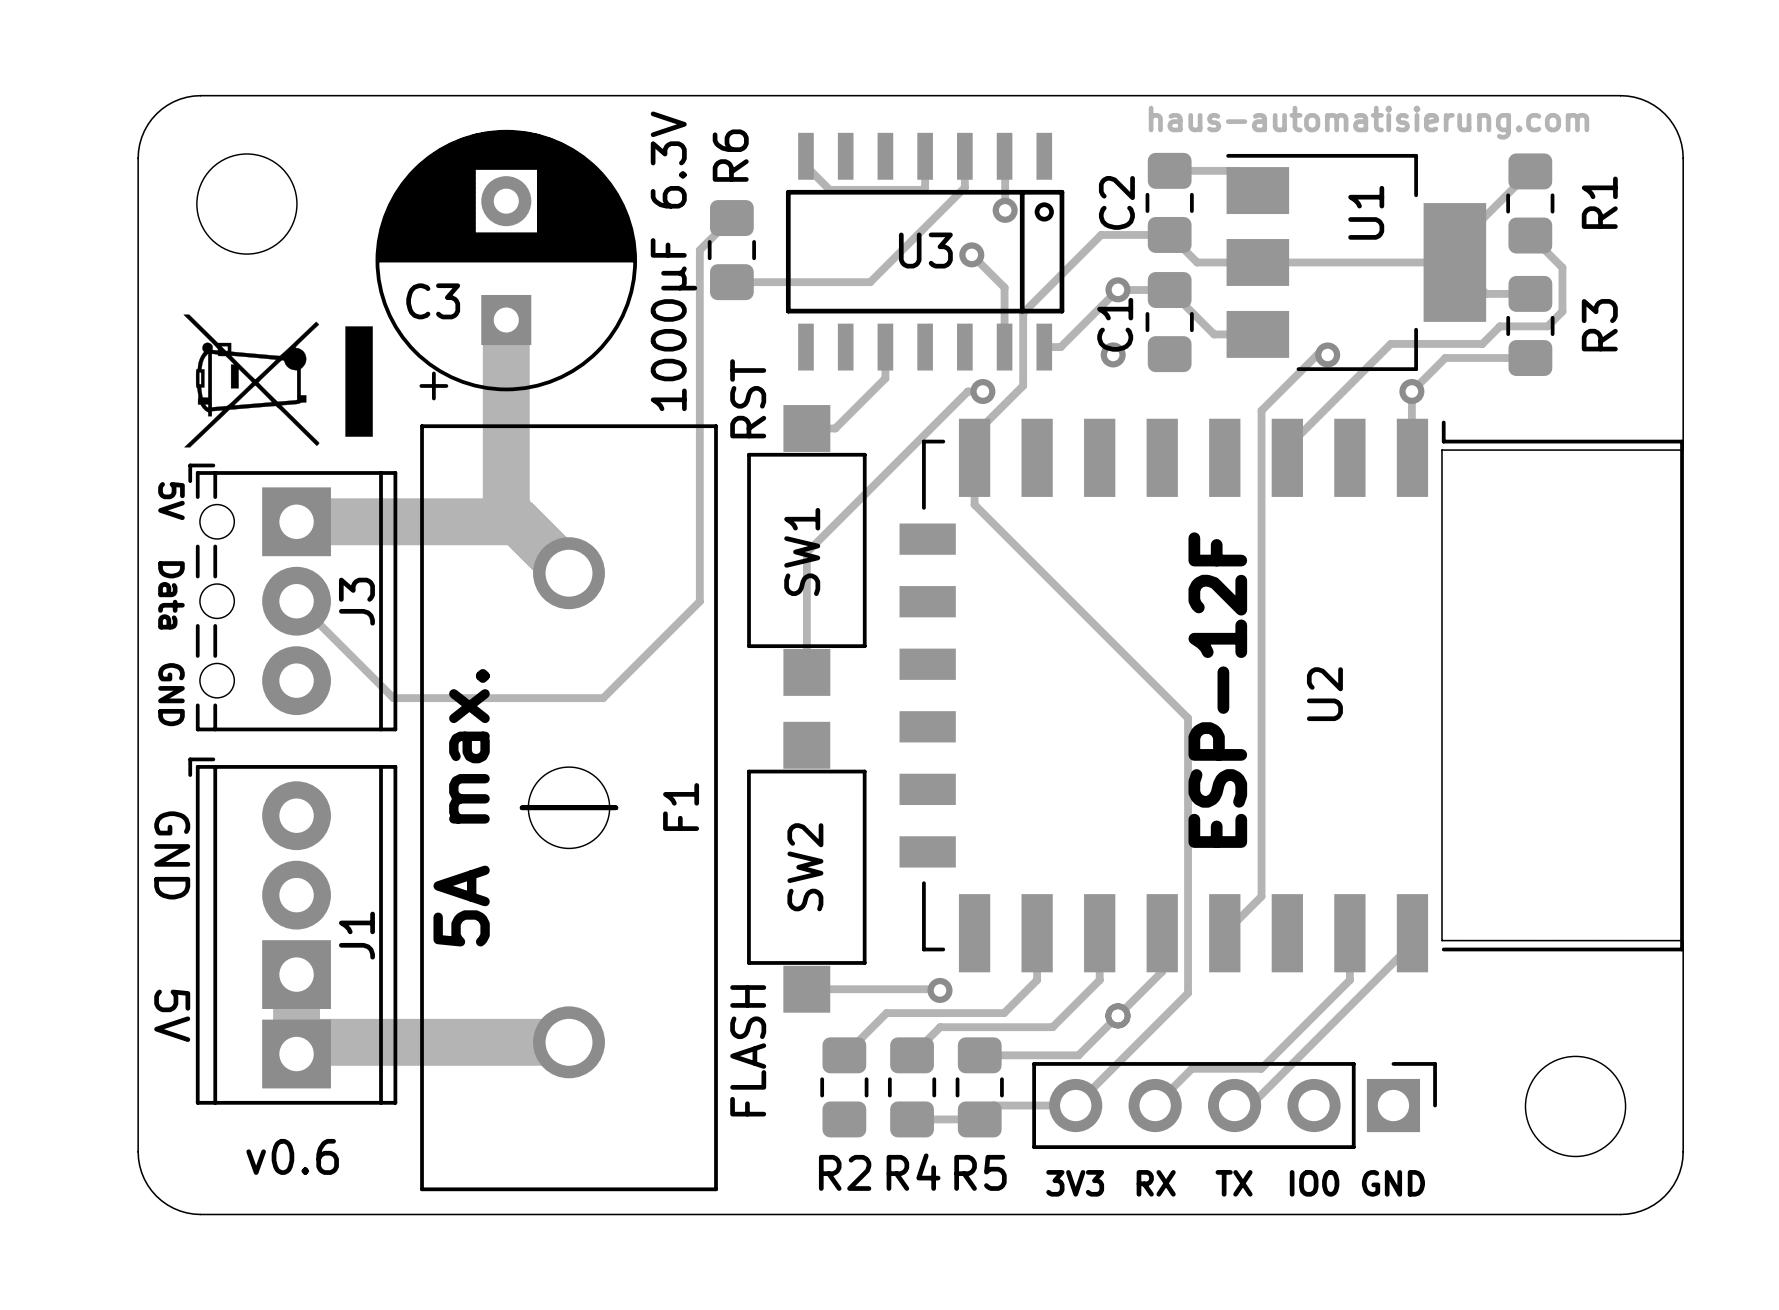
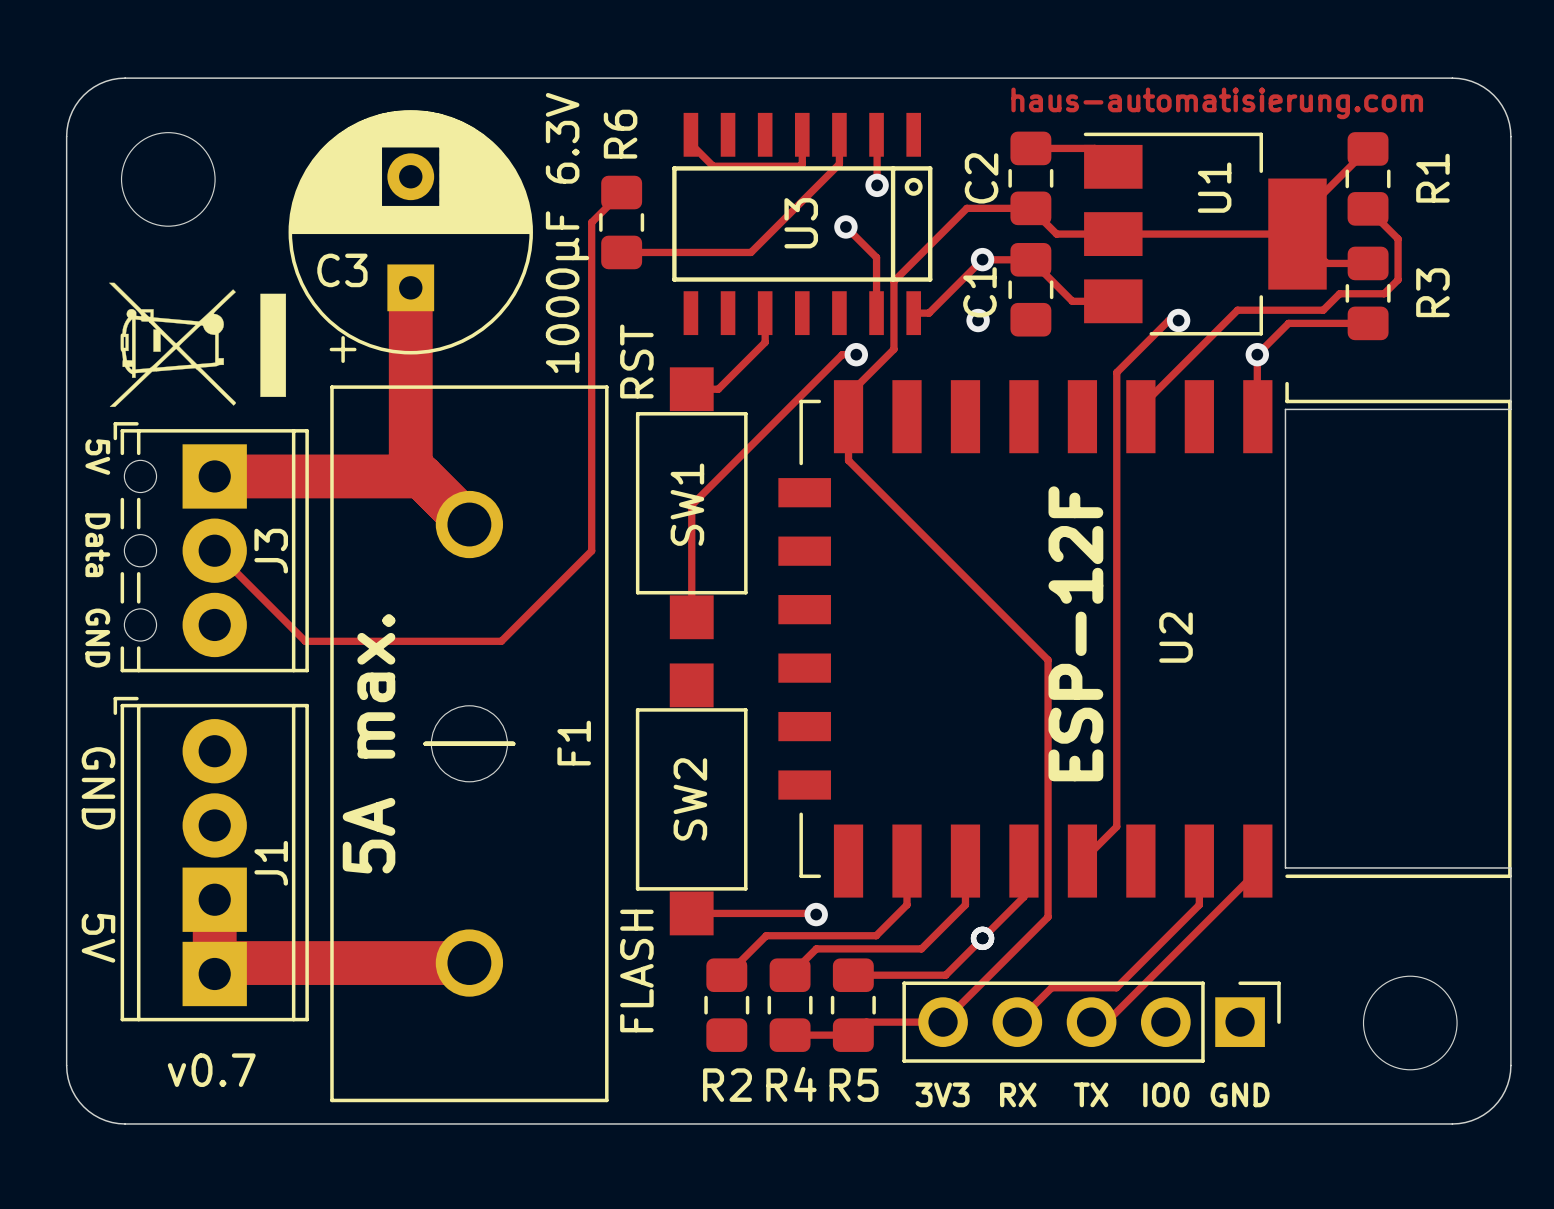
U3 name rotation: 0° (925, 250) -> 90° counterclockwise (801, 223)
text: v0.6 (292, 1156) -> v0.7 (211, 1070)

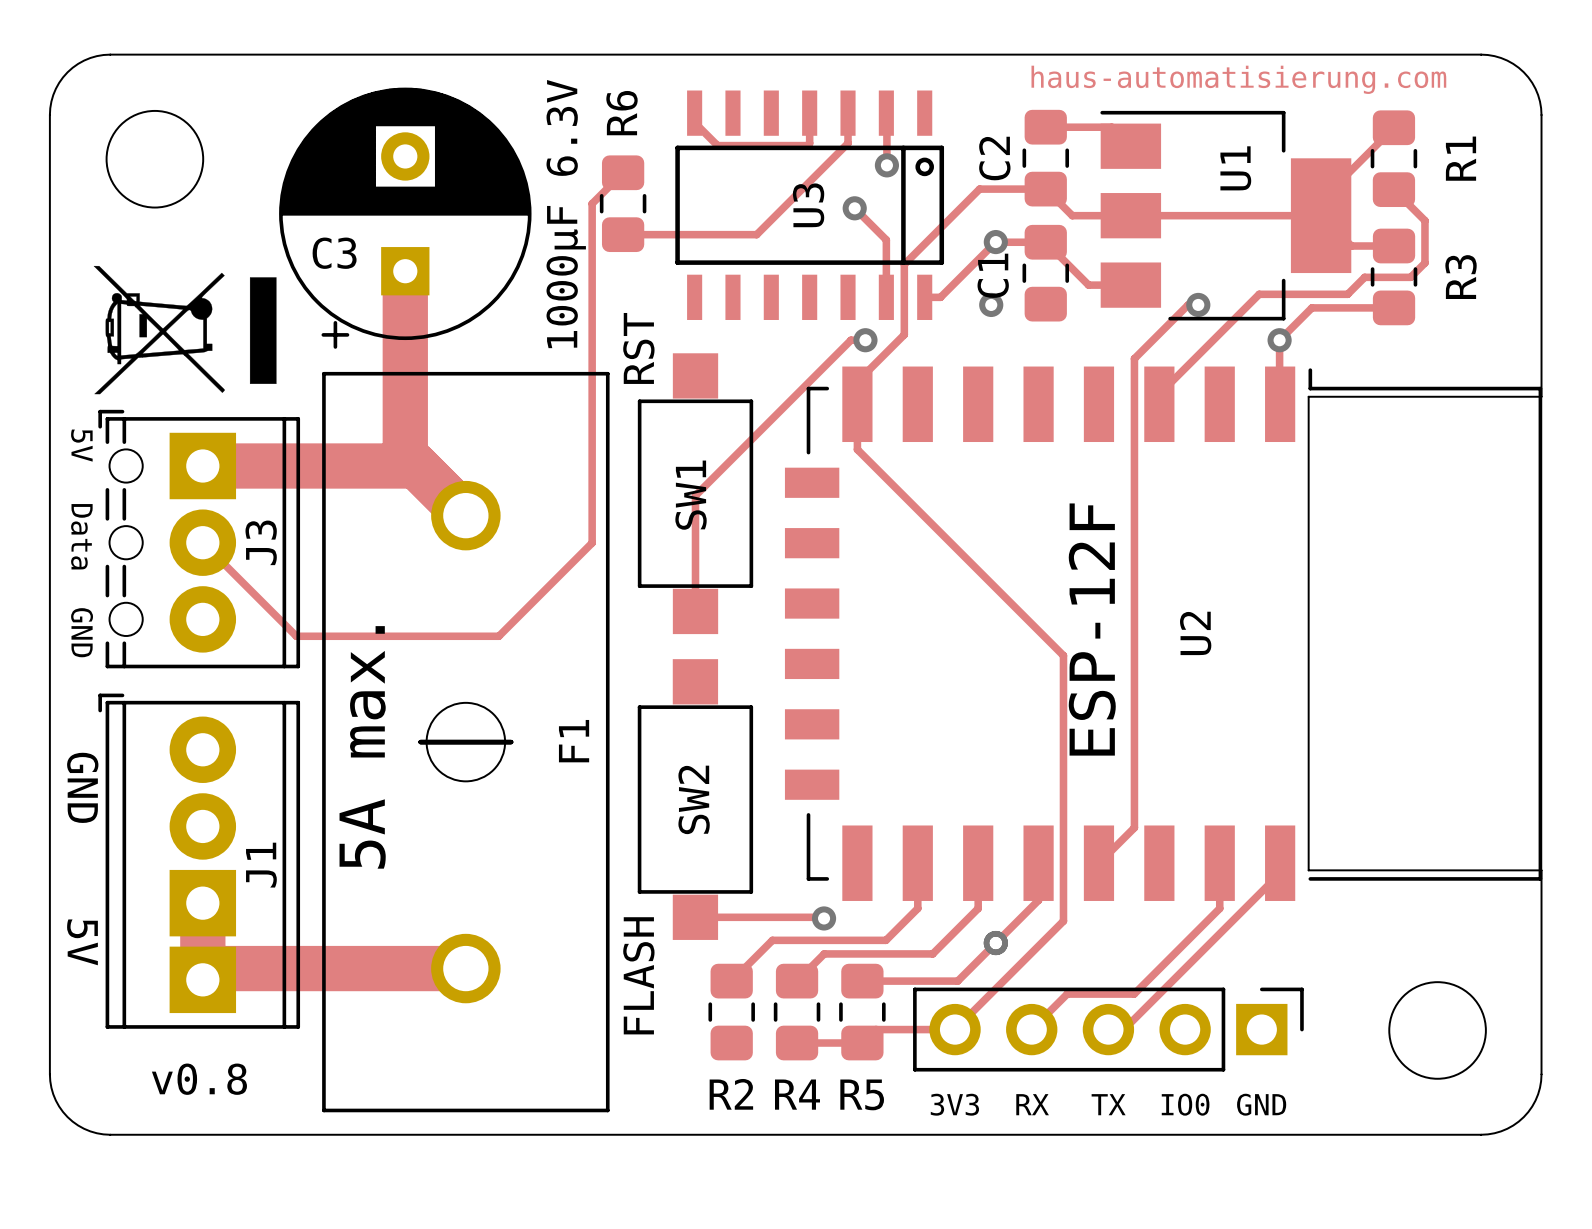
track: (765, 313) (765, 342) (718, 389) (691, 389) -> none
text: v0.7 (211, 1070) -> v0.8 (199, 1079)

